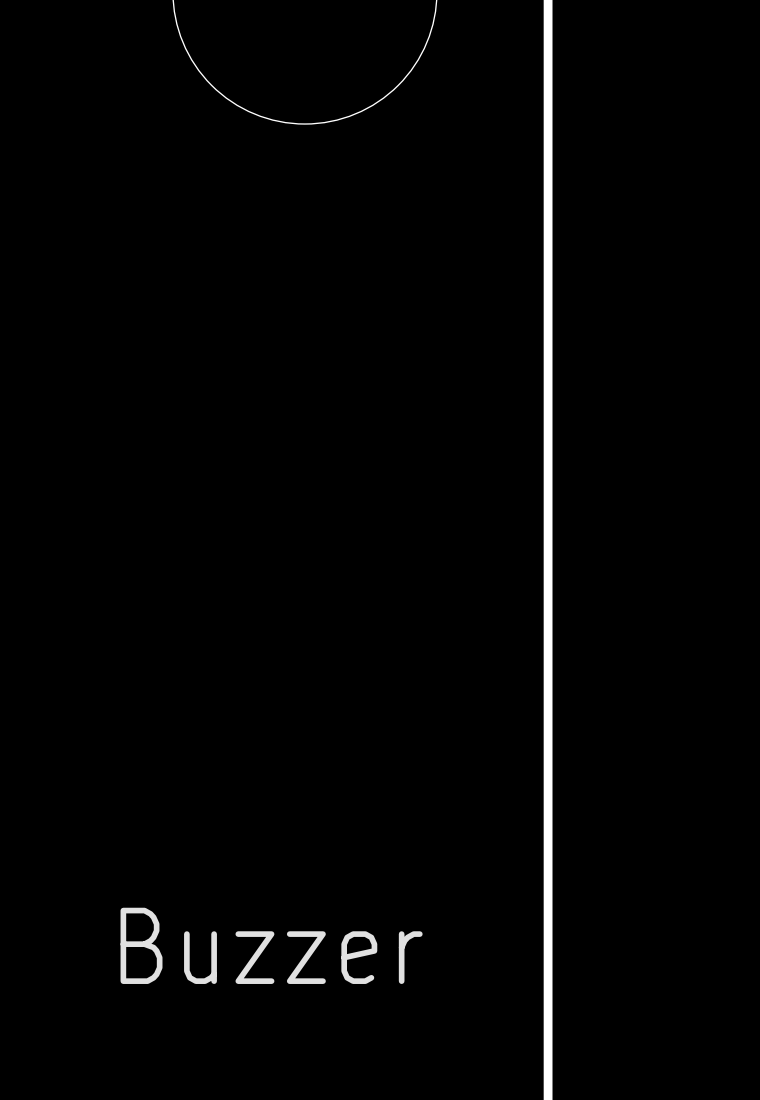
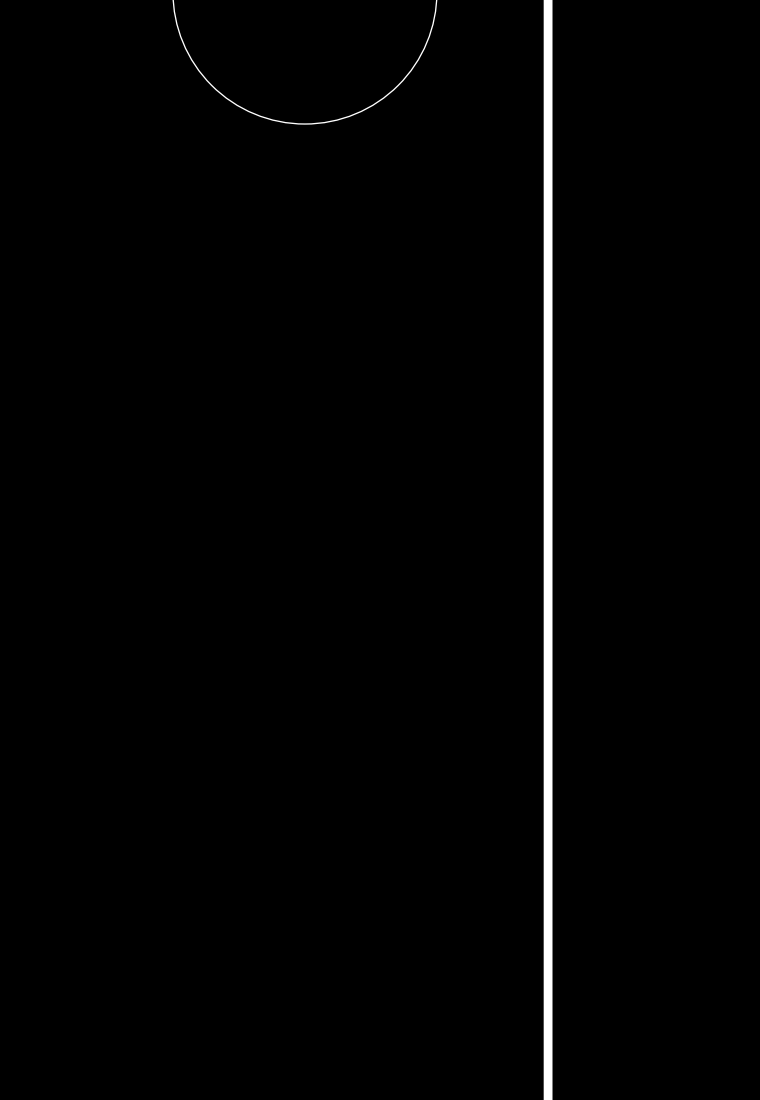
text: Buzzer (271, 945) -> none

